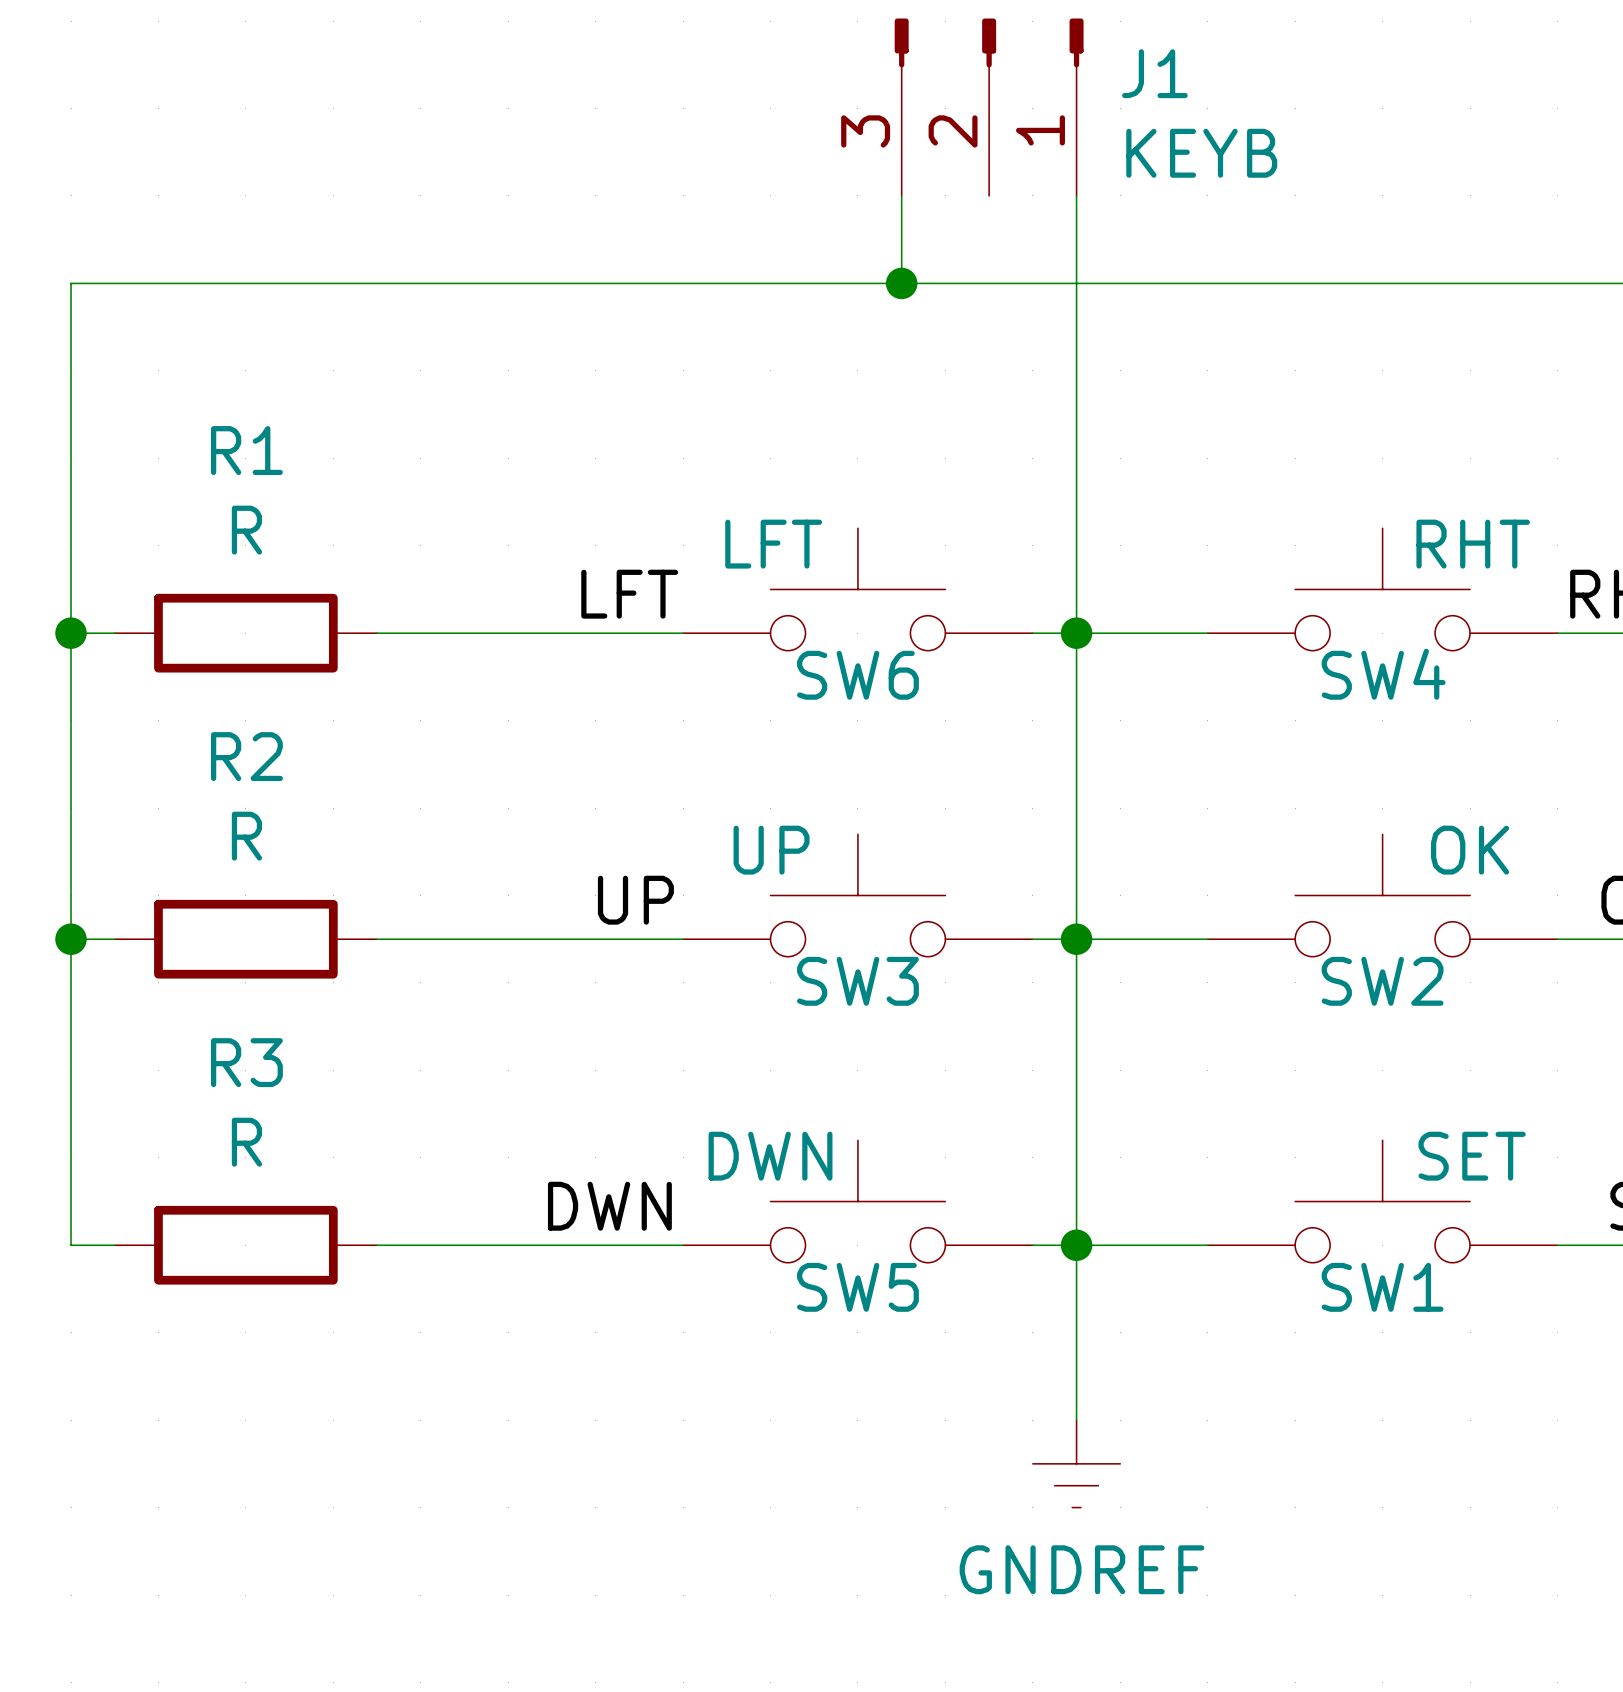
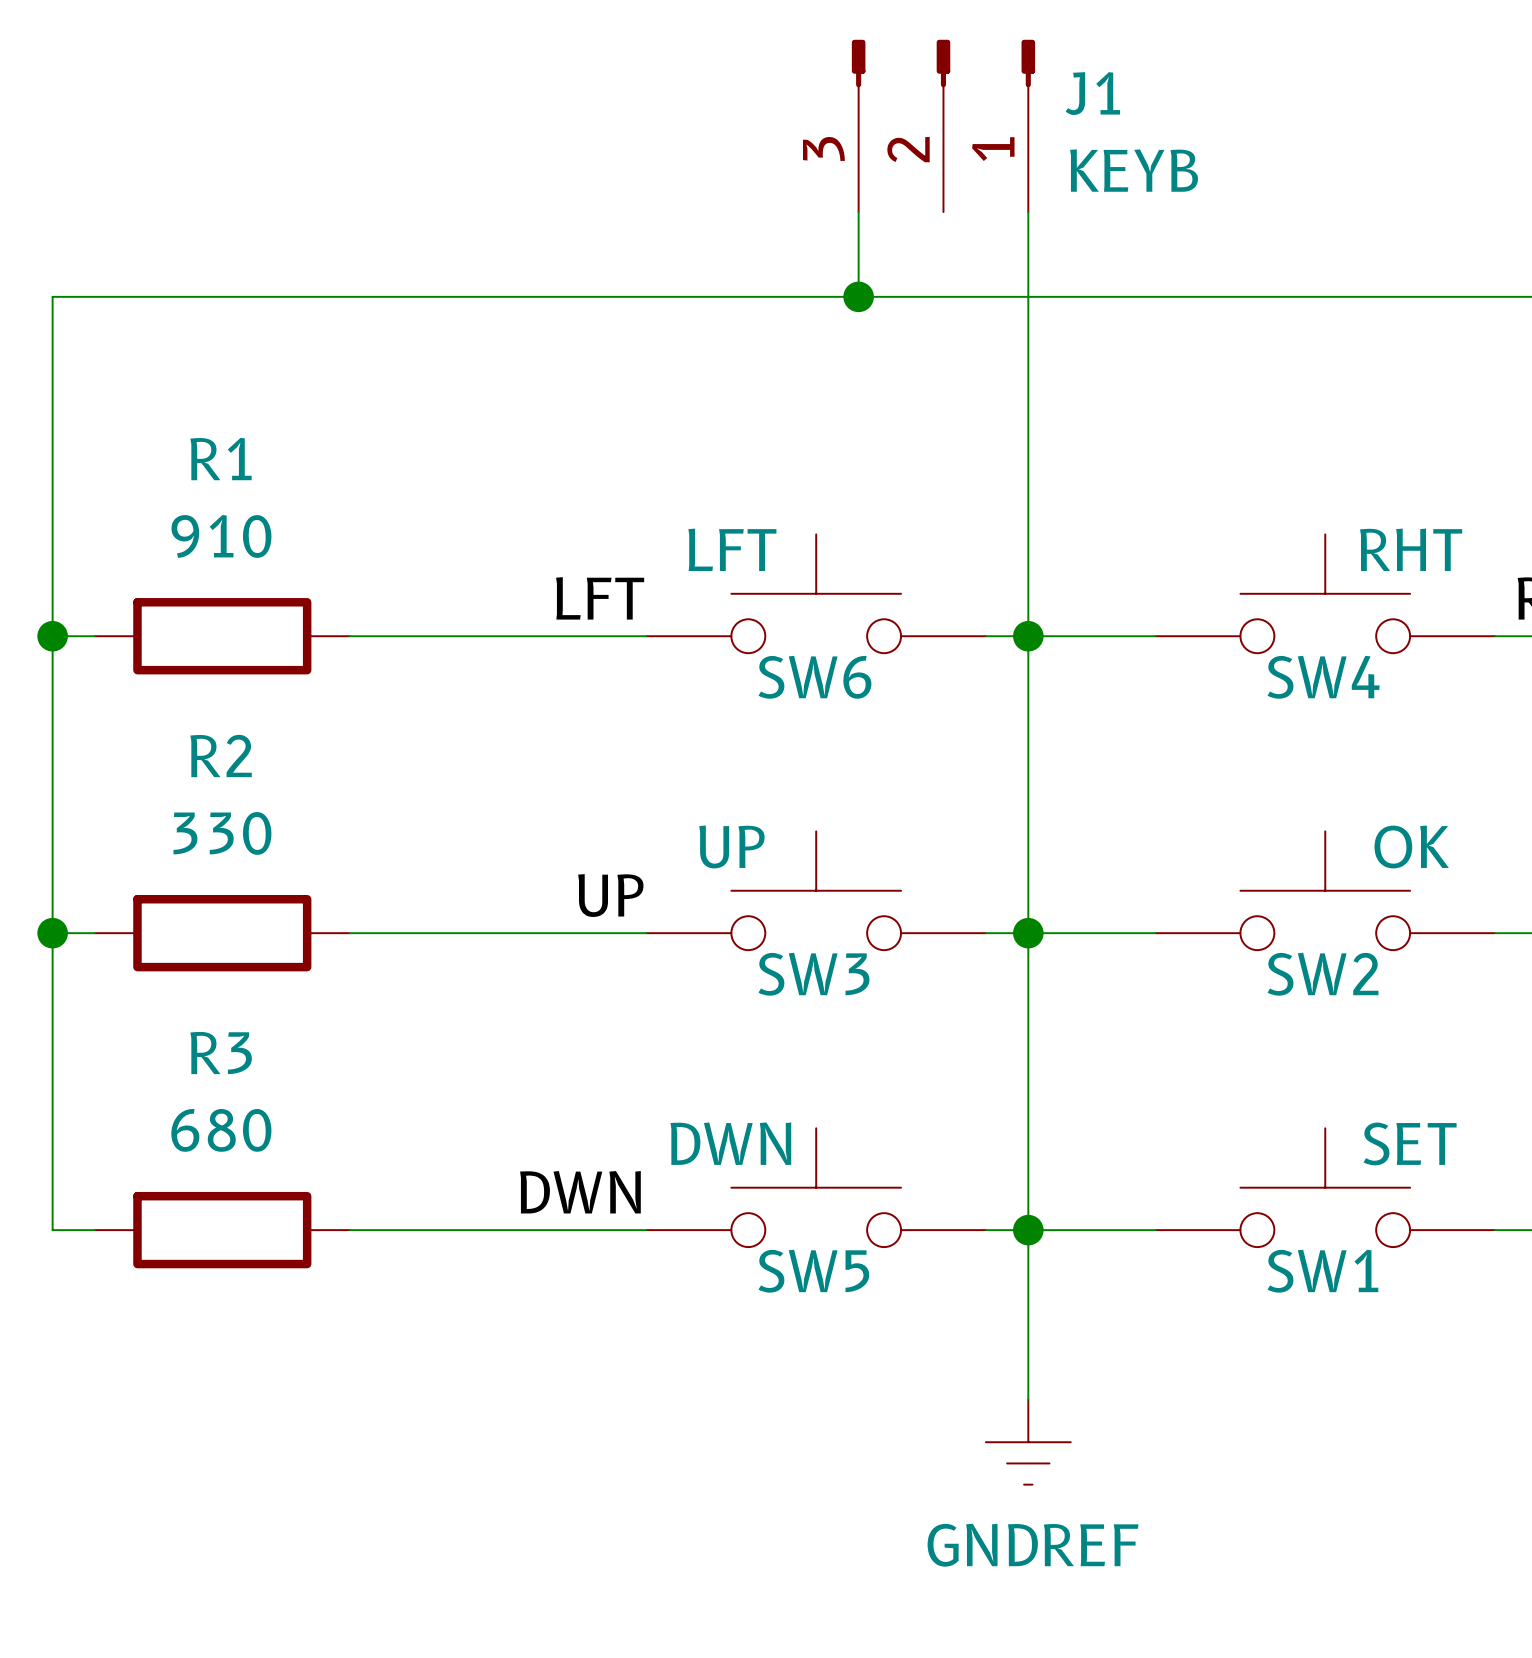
R1 value: R (246, 530) -> 910 (221, 536)
R2 value: R (246, 836) -> 330 (222, 833)
R3 value: R (246, 1142) -> 680 (221, 1130)

